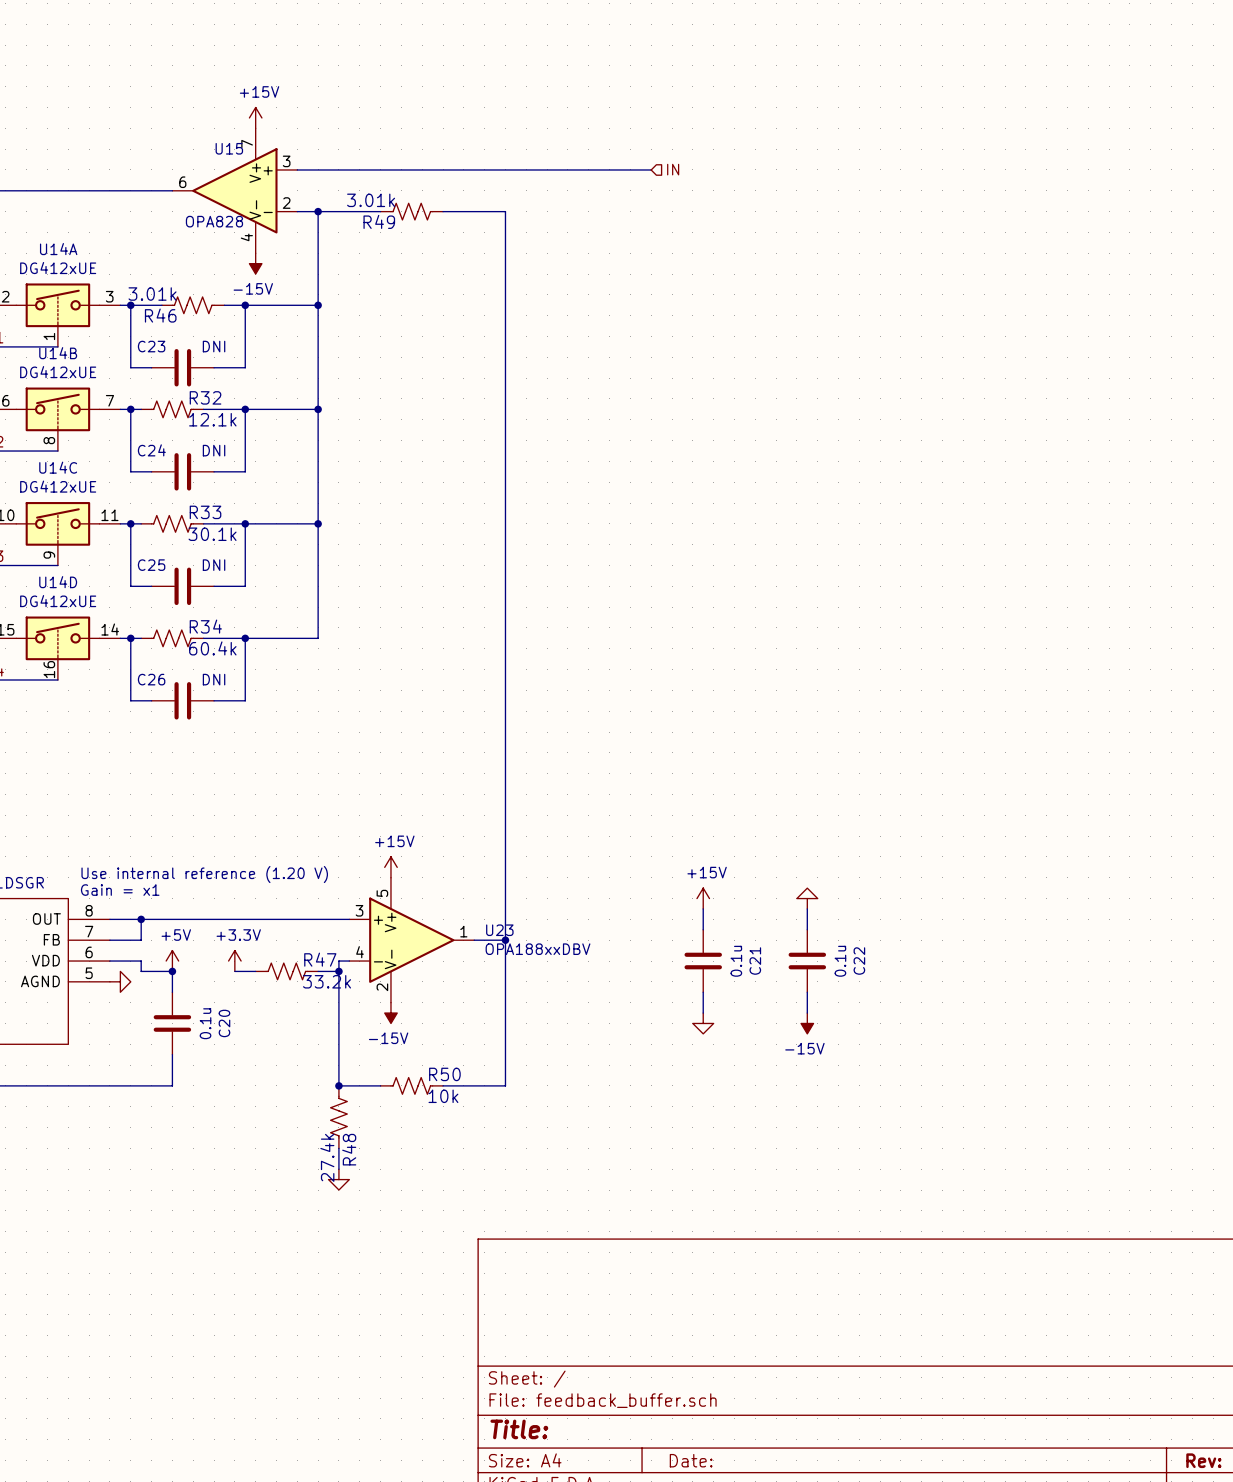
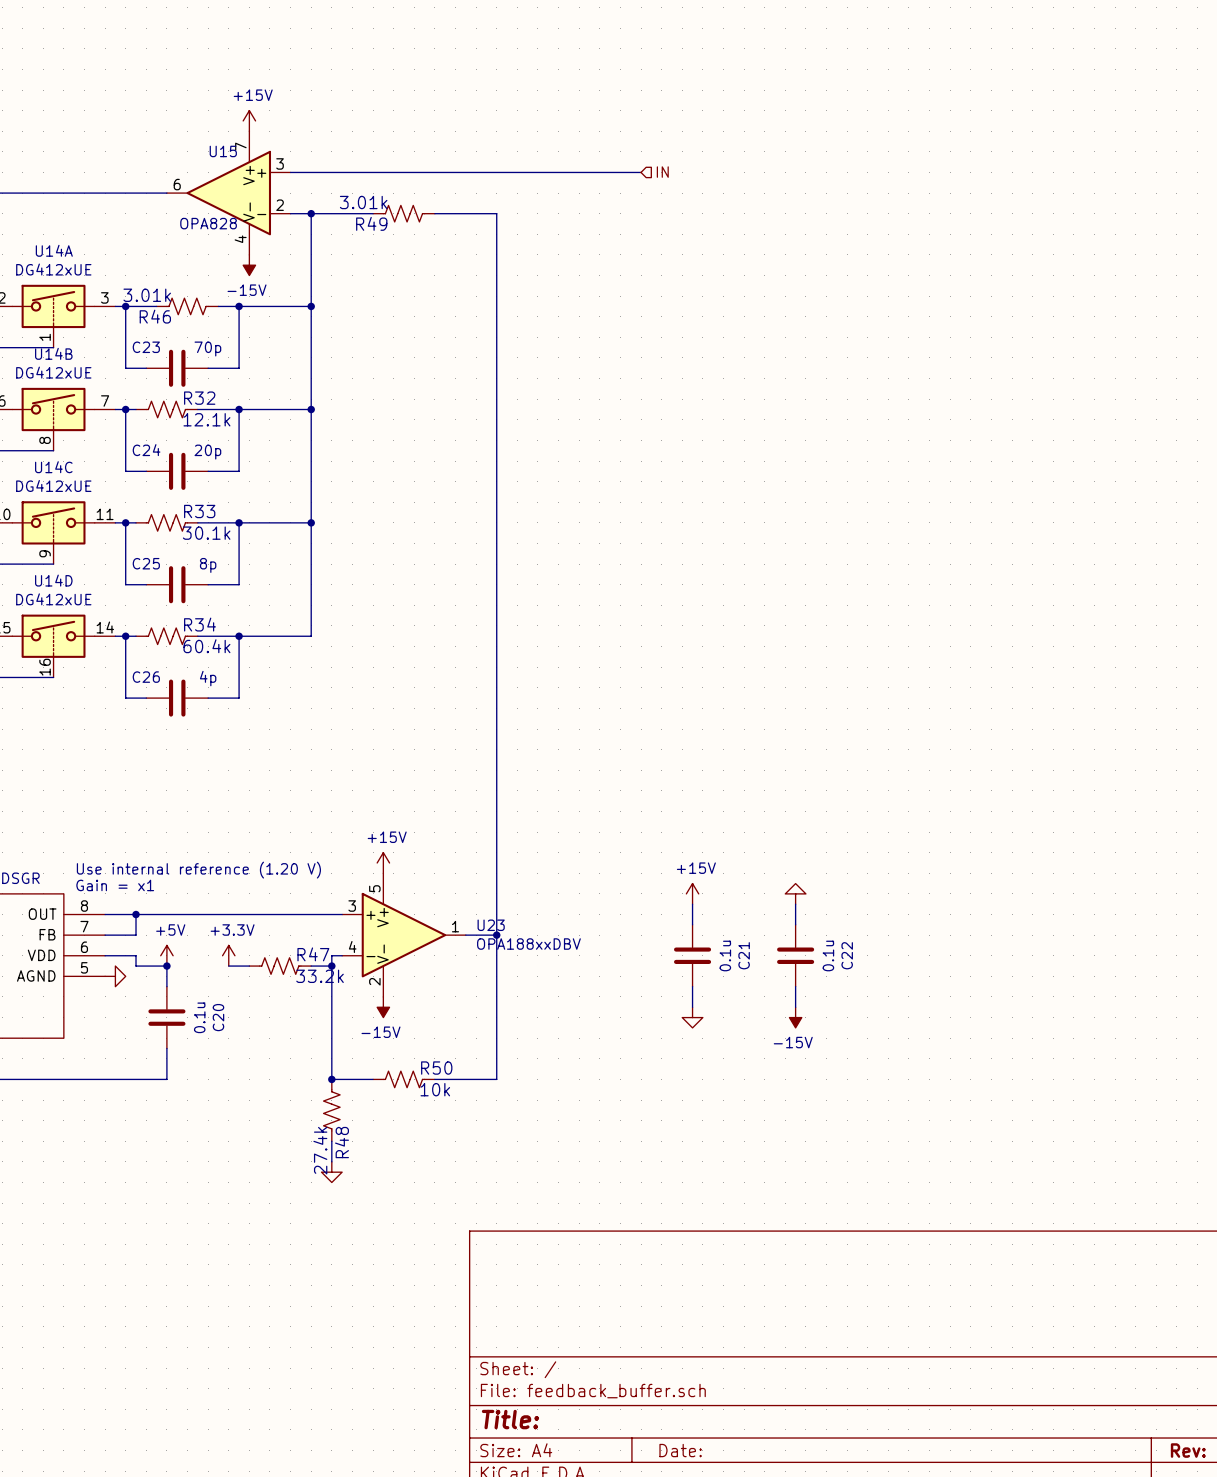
C23 value: DNI (214, 346) -> 70p (207, 349)
C24 value: DNI (214, 450) -> 20p (207, 452)
C25 value: DNI (214, 565) -> 8p (208, 565)
C26 value: DNI (214, 679) -> 4p (208, 678)

